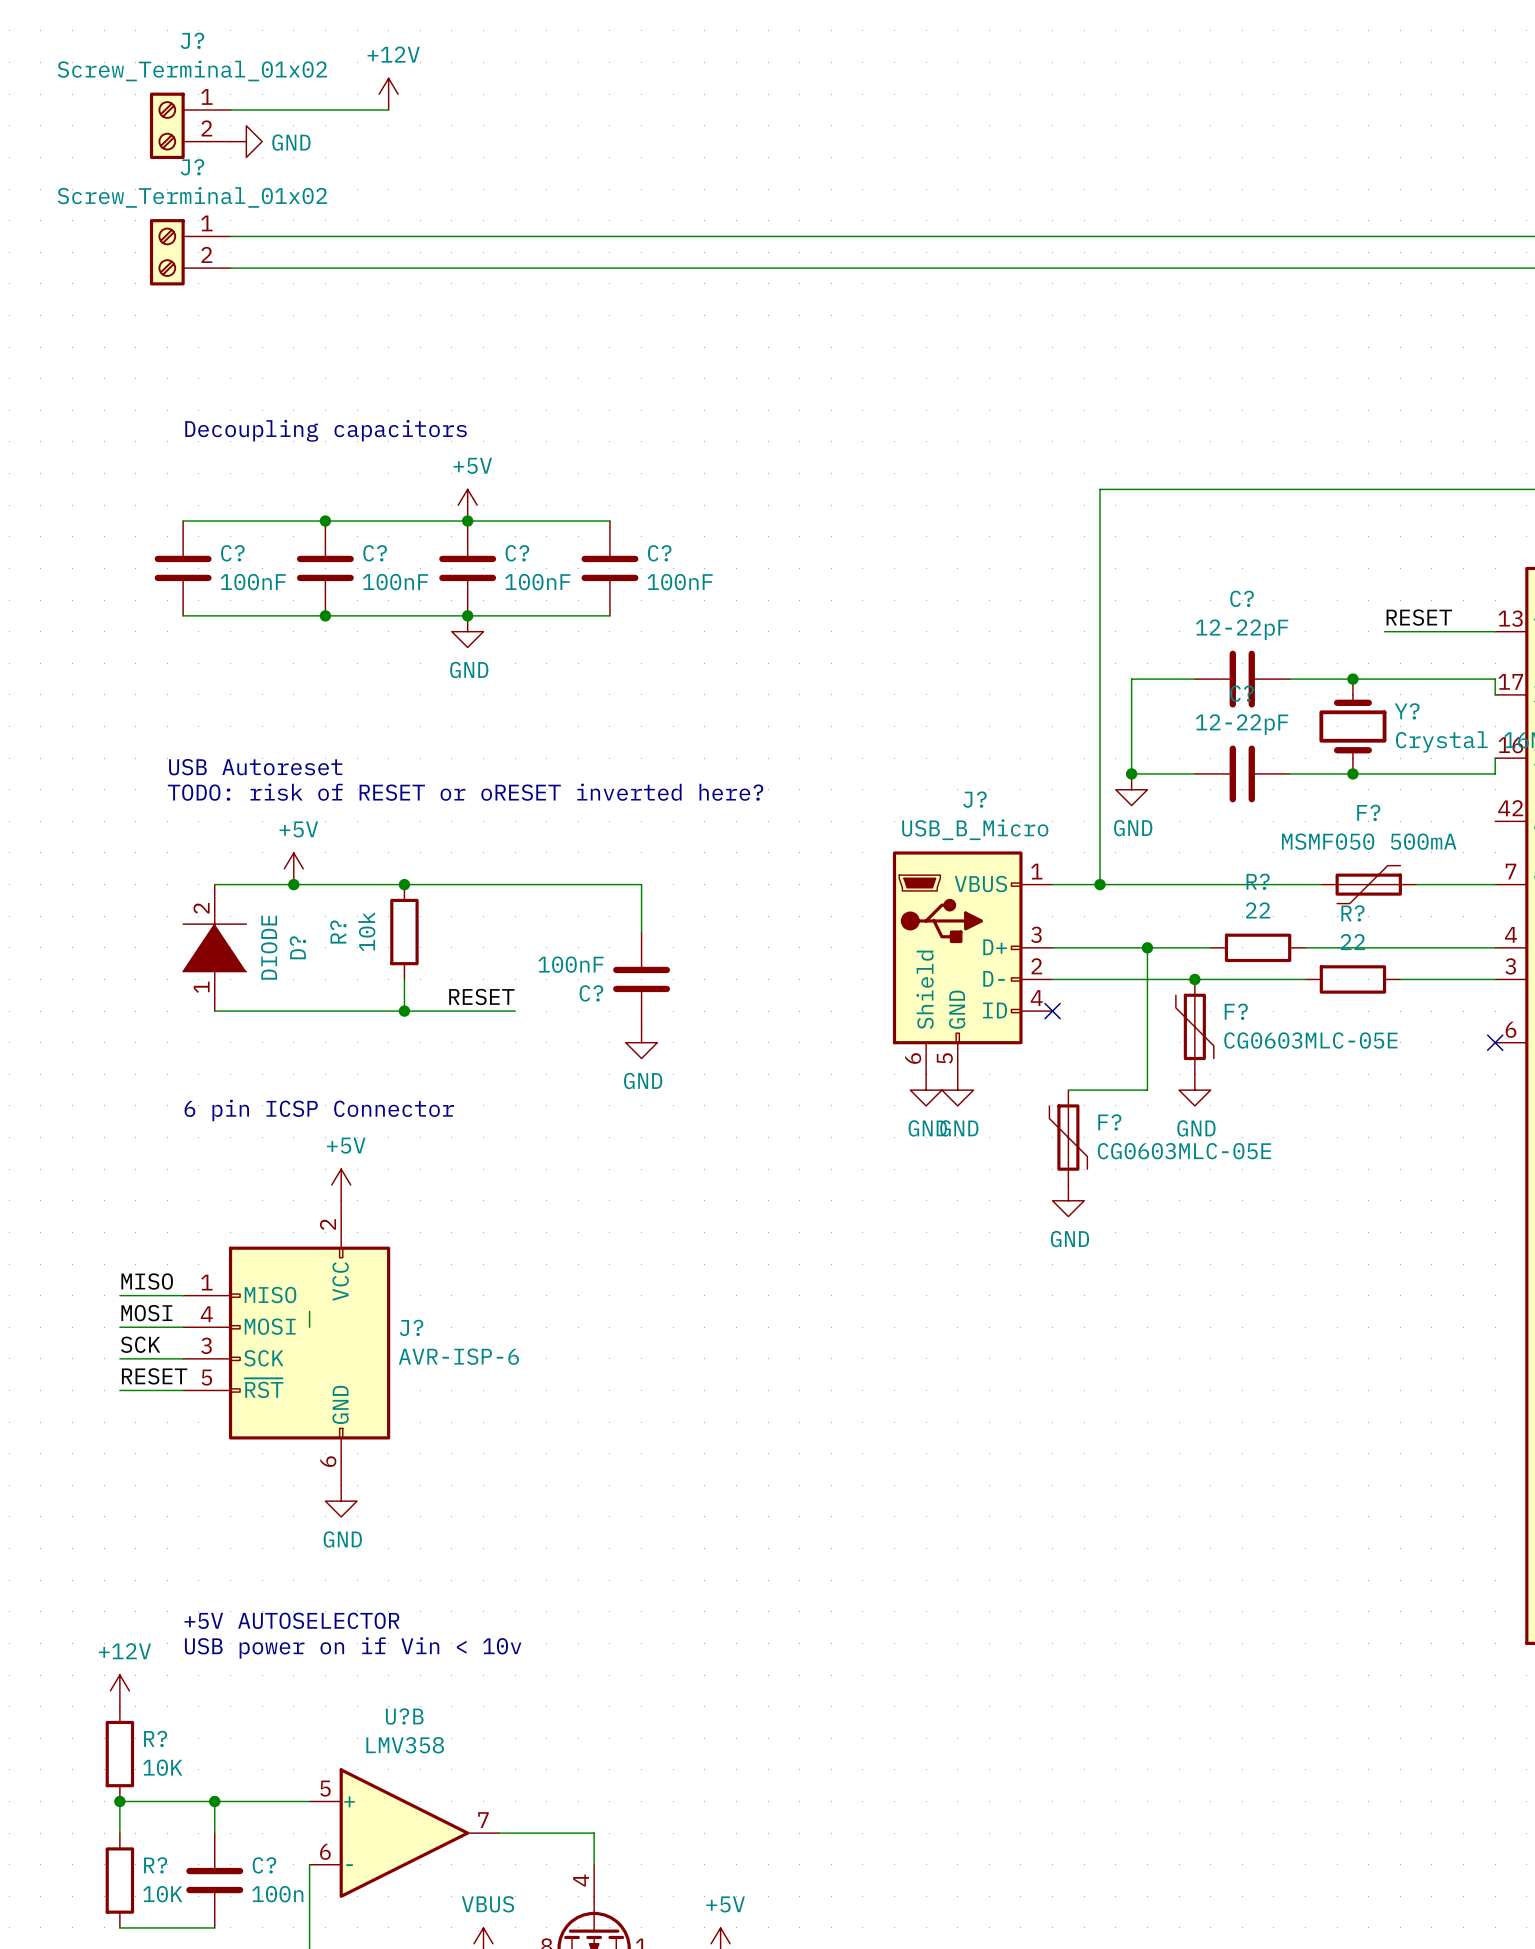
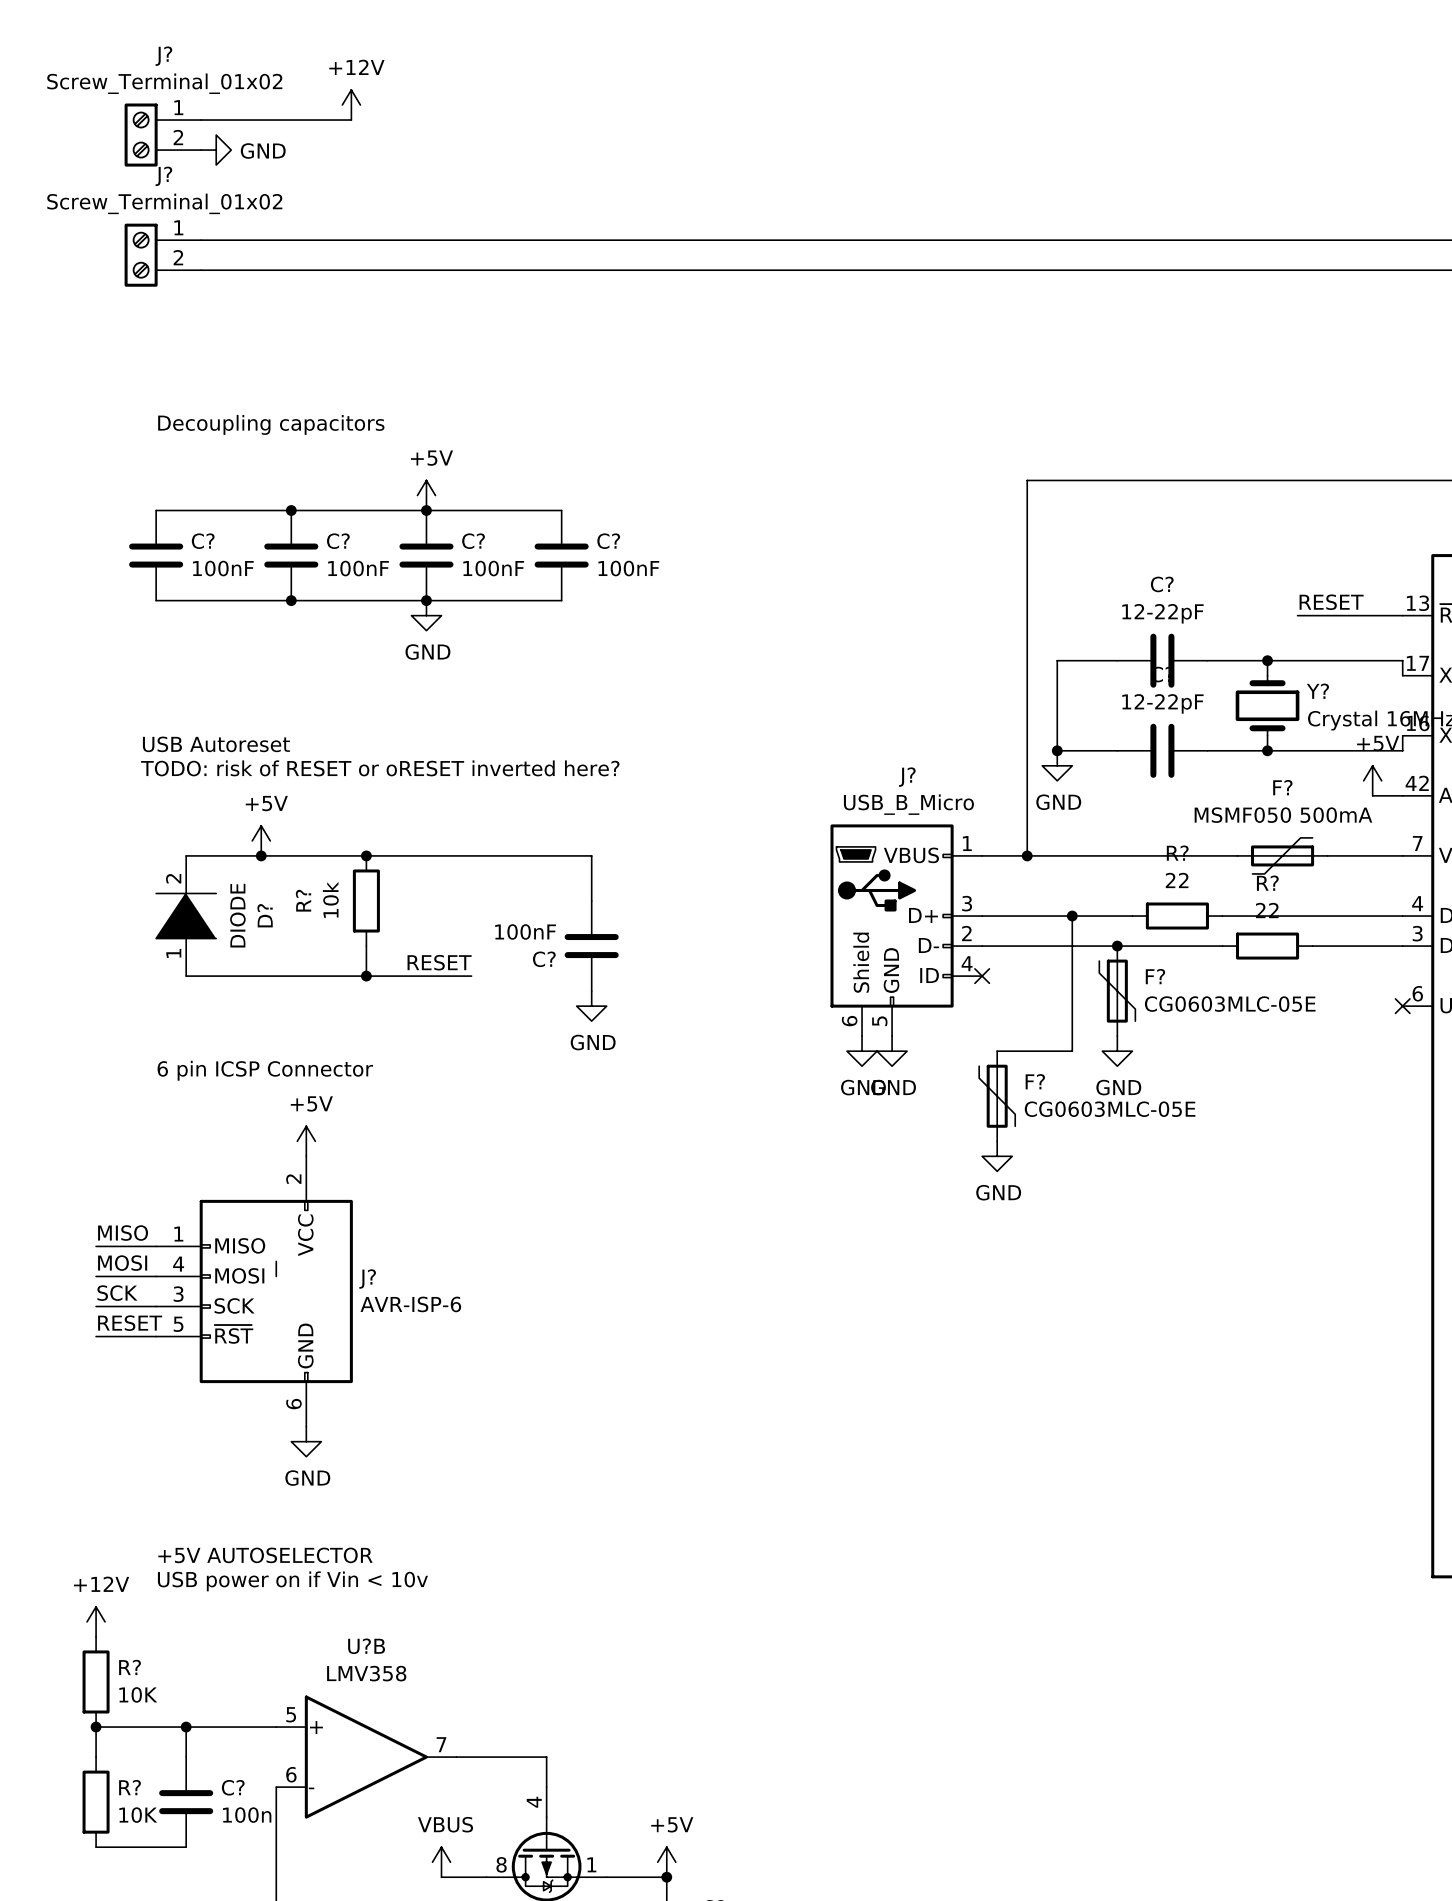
power symbol: none -> +5V (1372, 780)
wire: none -> (1372, 795) (1402, 795)

